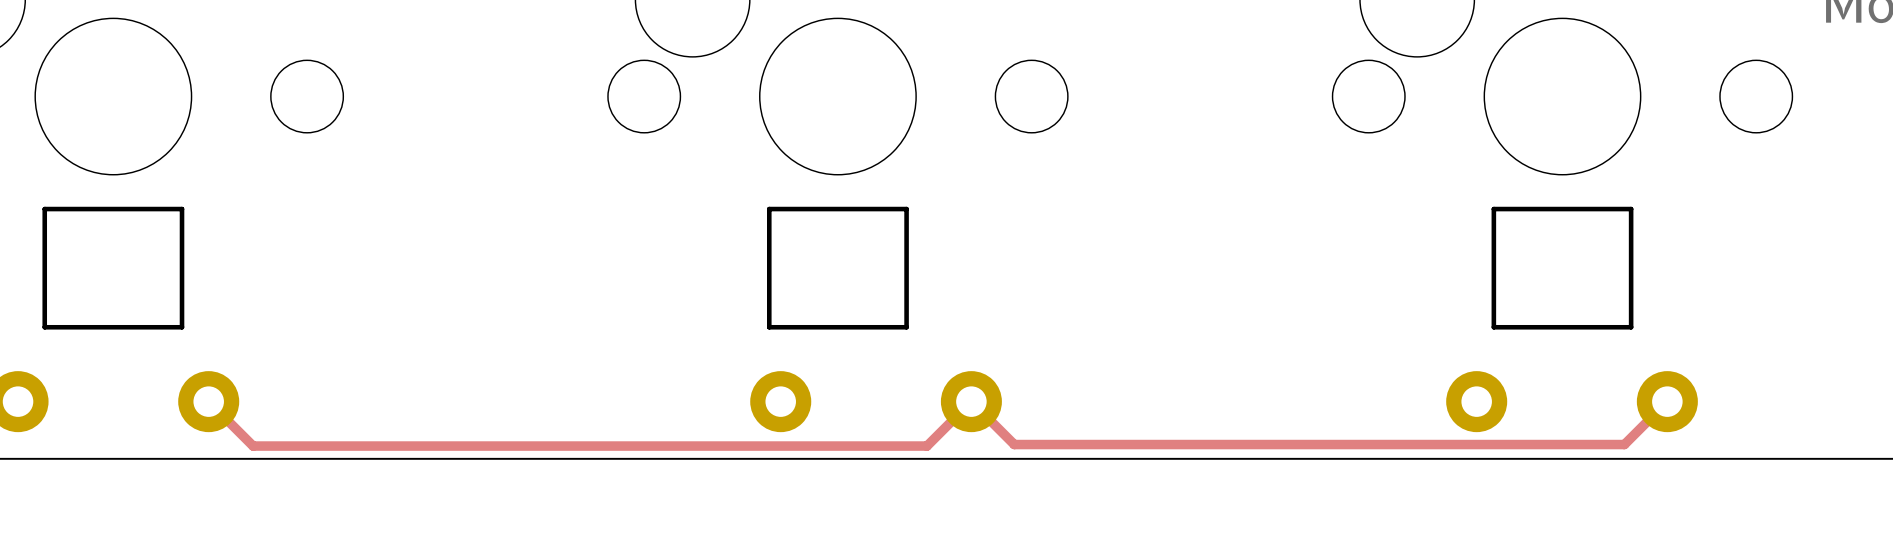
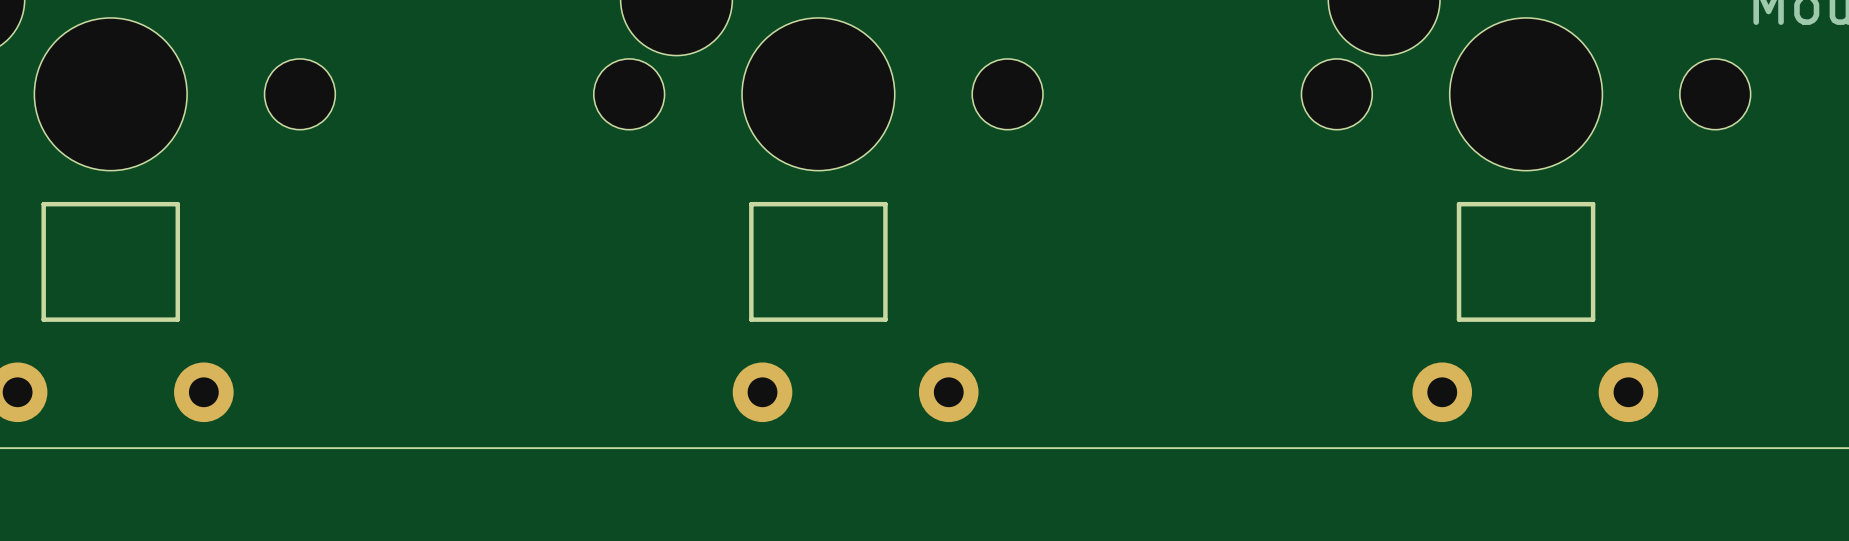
track: (208, 401) (253, 446) (926, 446) (971, 401) (1014, 444) (1624, 444) (1667, 401) -> none

